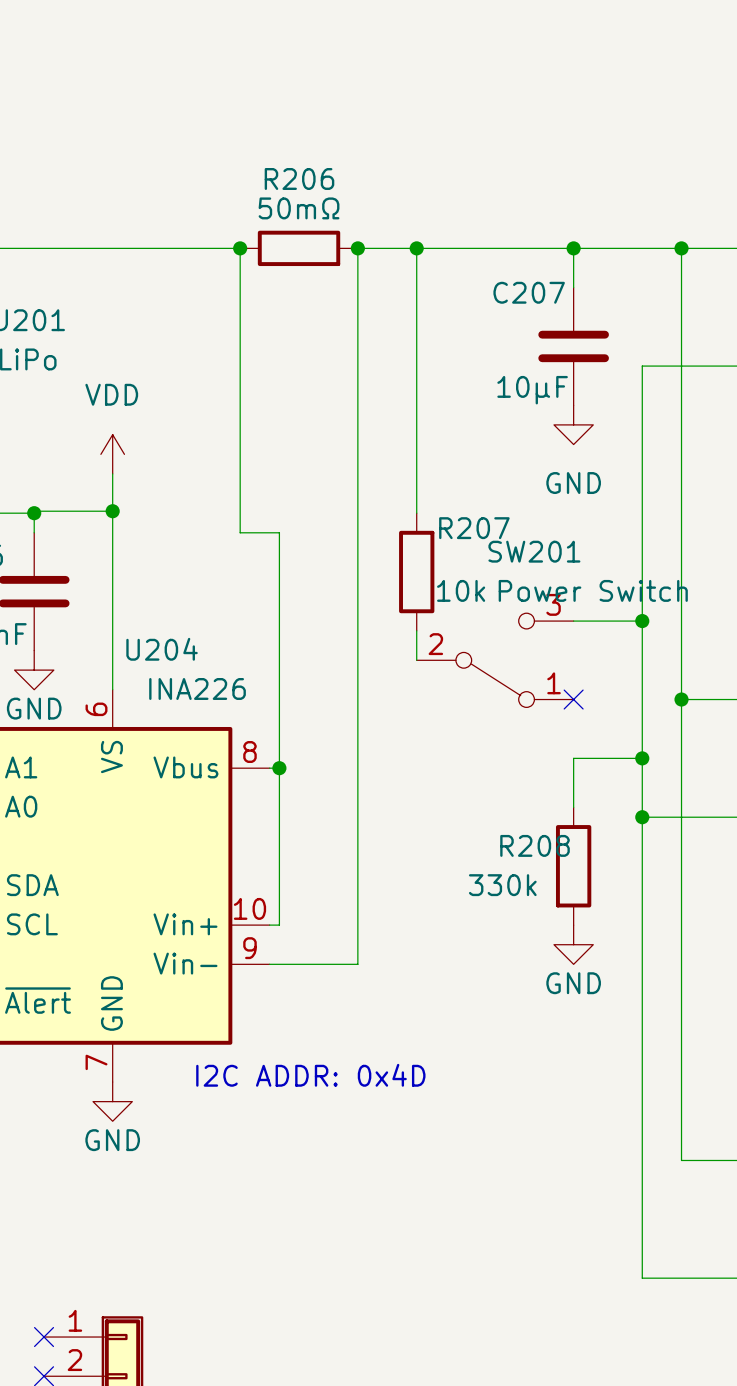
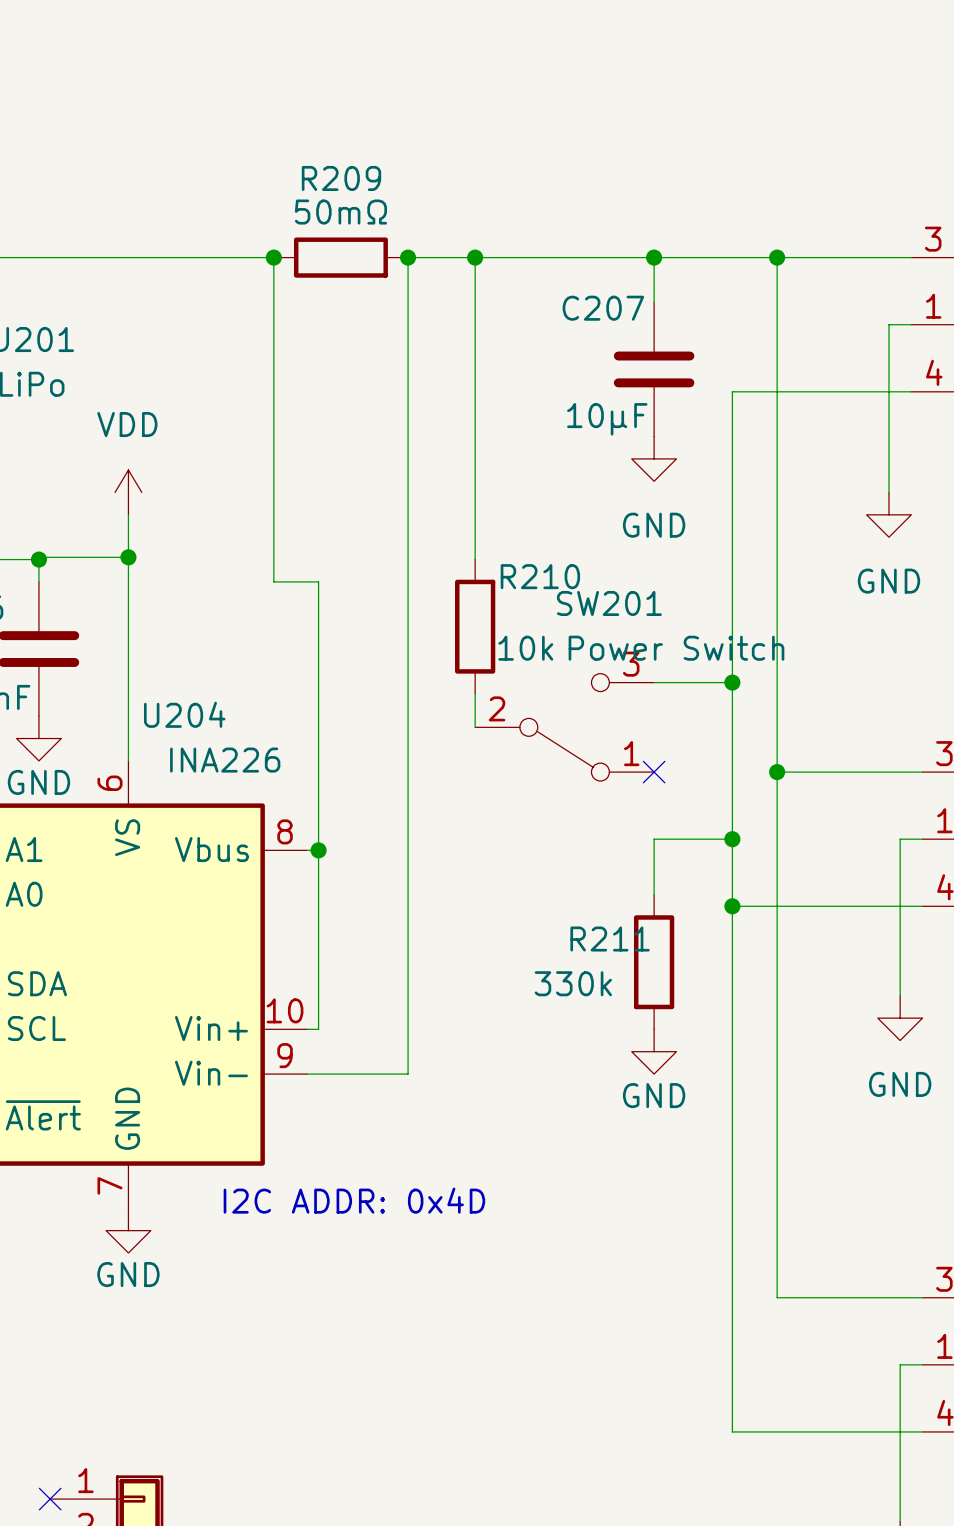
R206 name: R206 (299, 178) -> R209 (341, 178)
R207 name: R207 (474, 528) -> R210 (540, 576)
R208 name: R208 (535, 845) -> R211 (610, 939)

